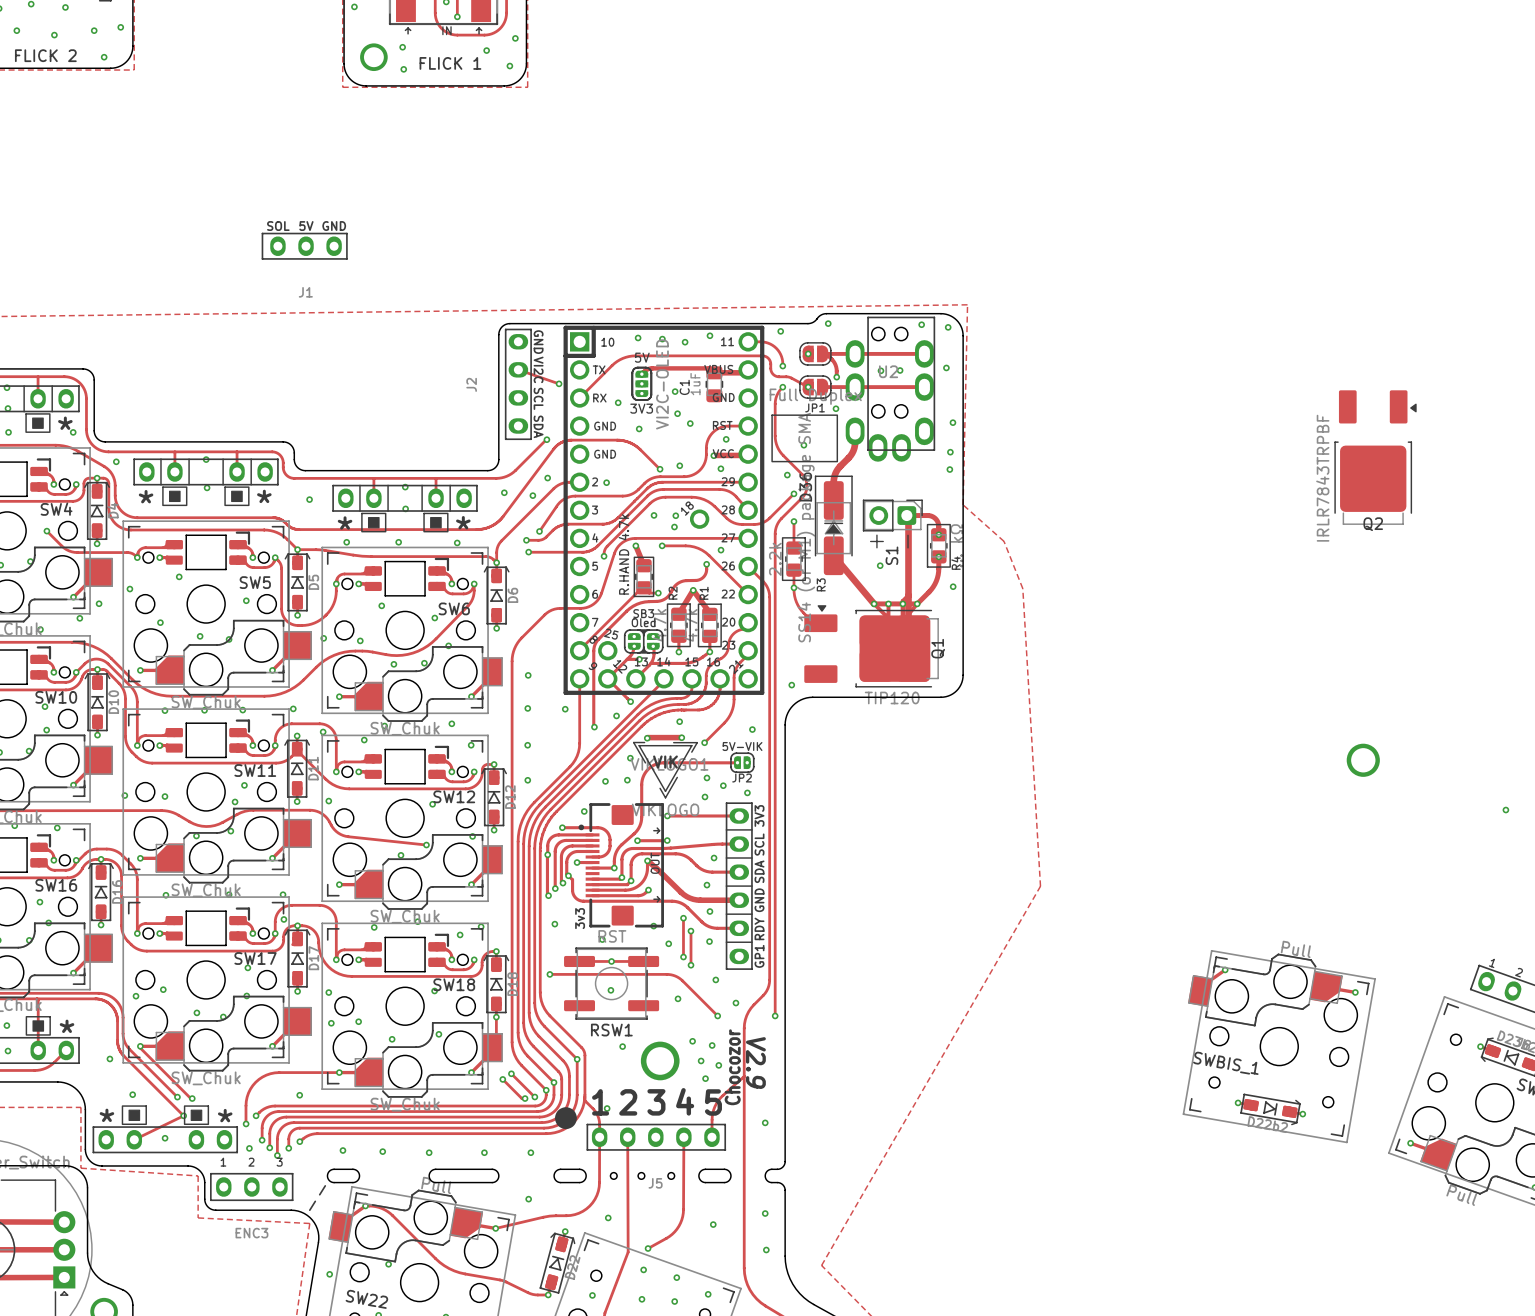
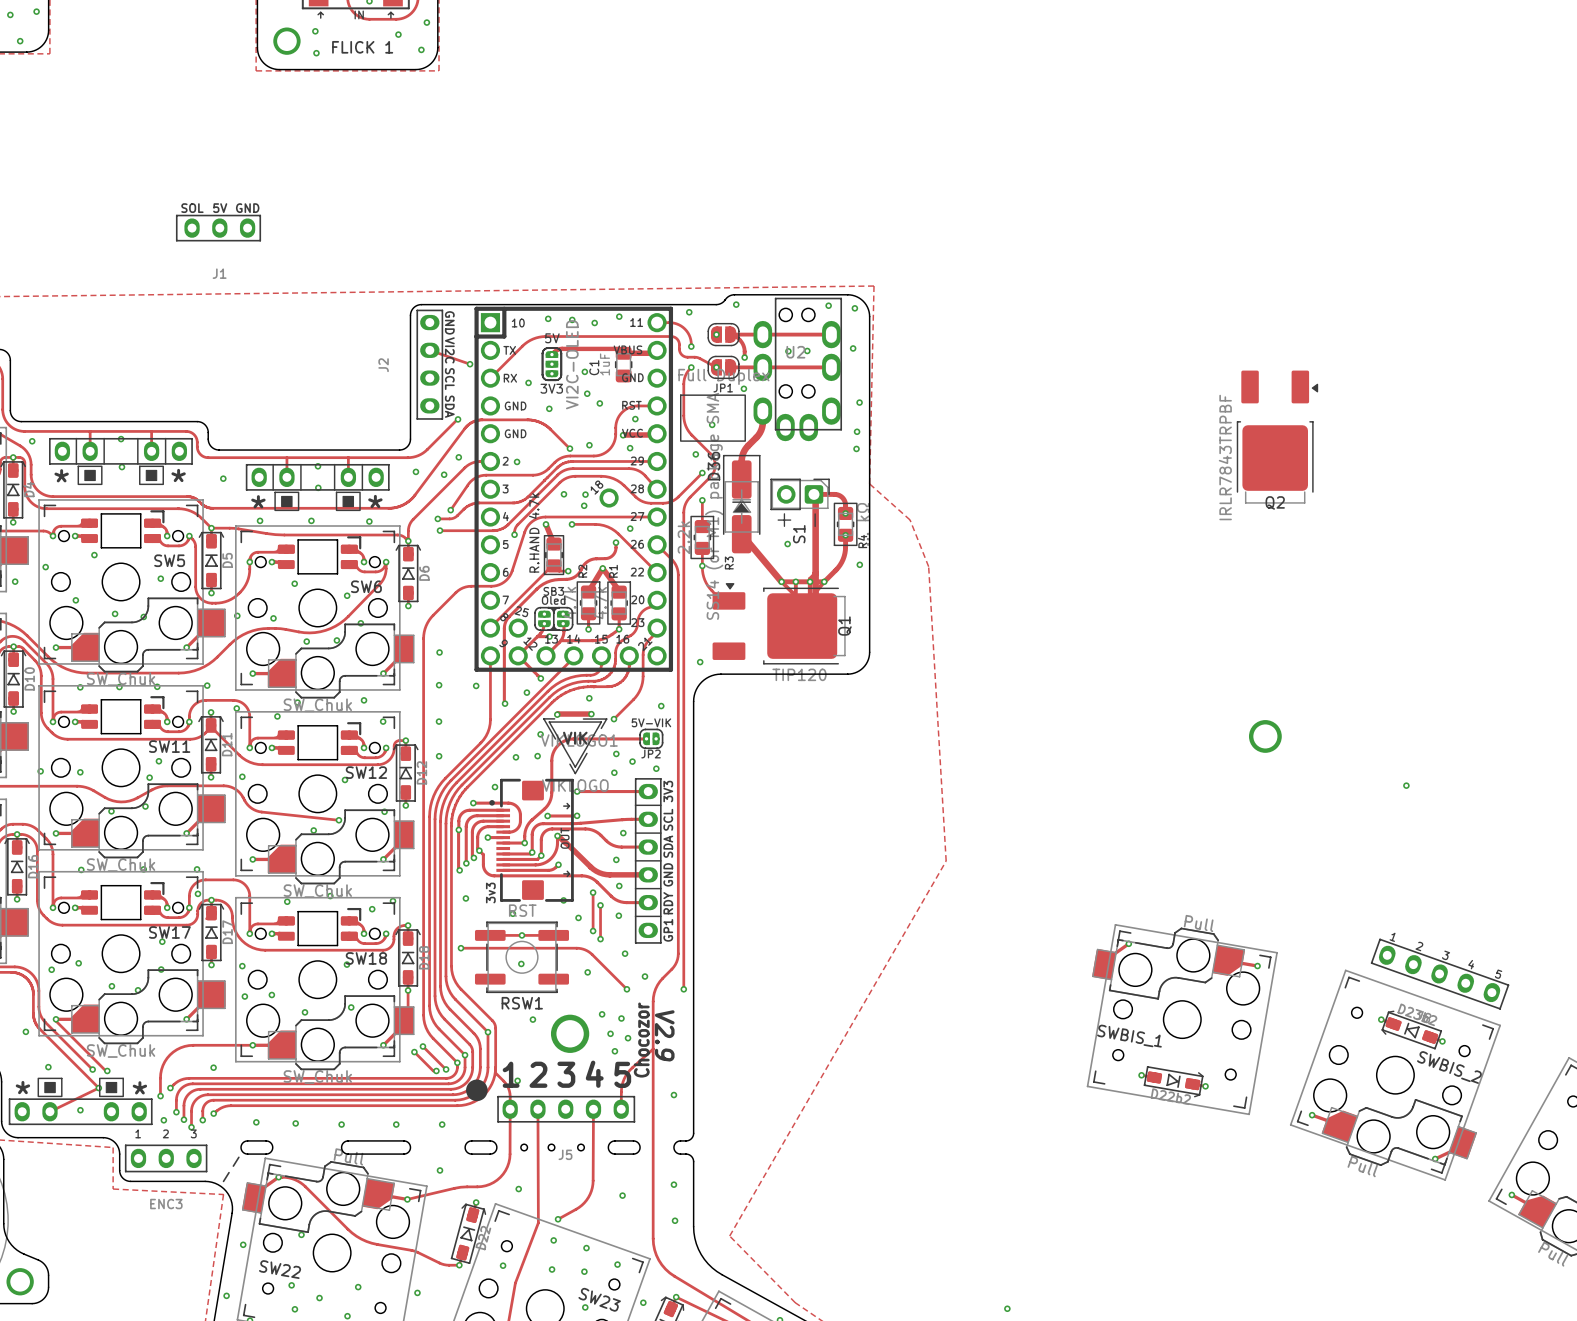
Q1 footprint: [804, 605, 939, 688] -> [712, 583, 846, 665]

